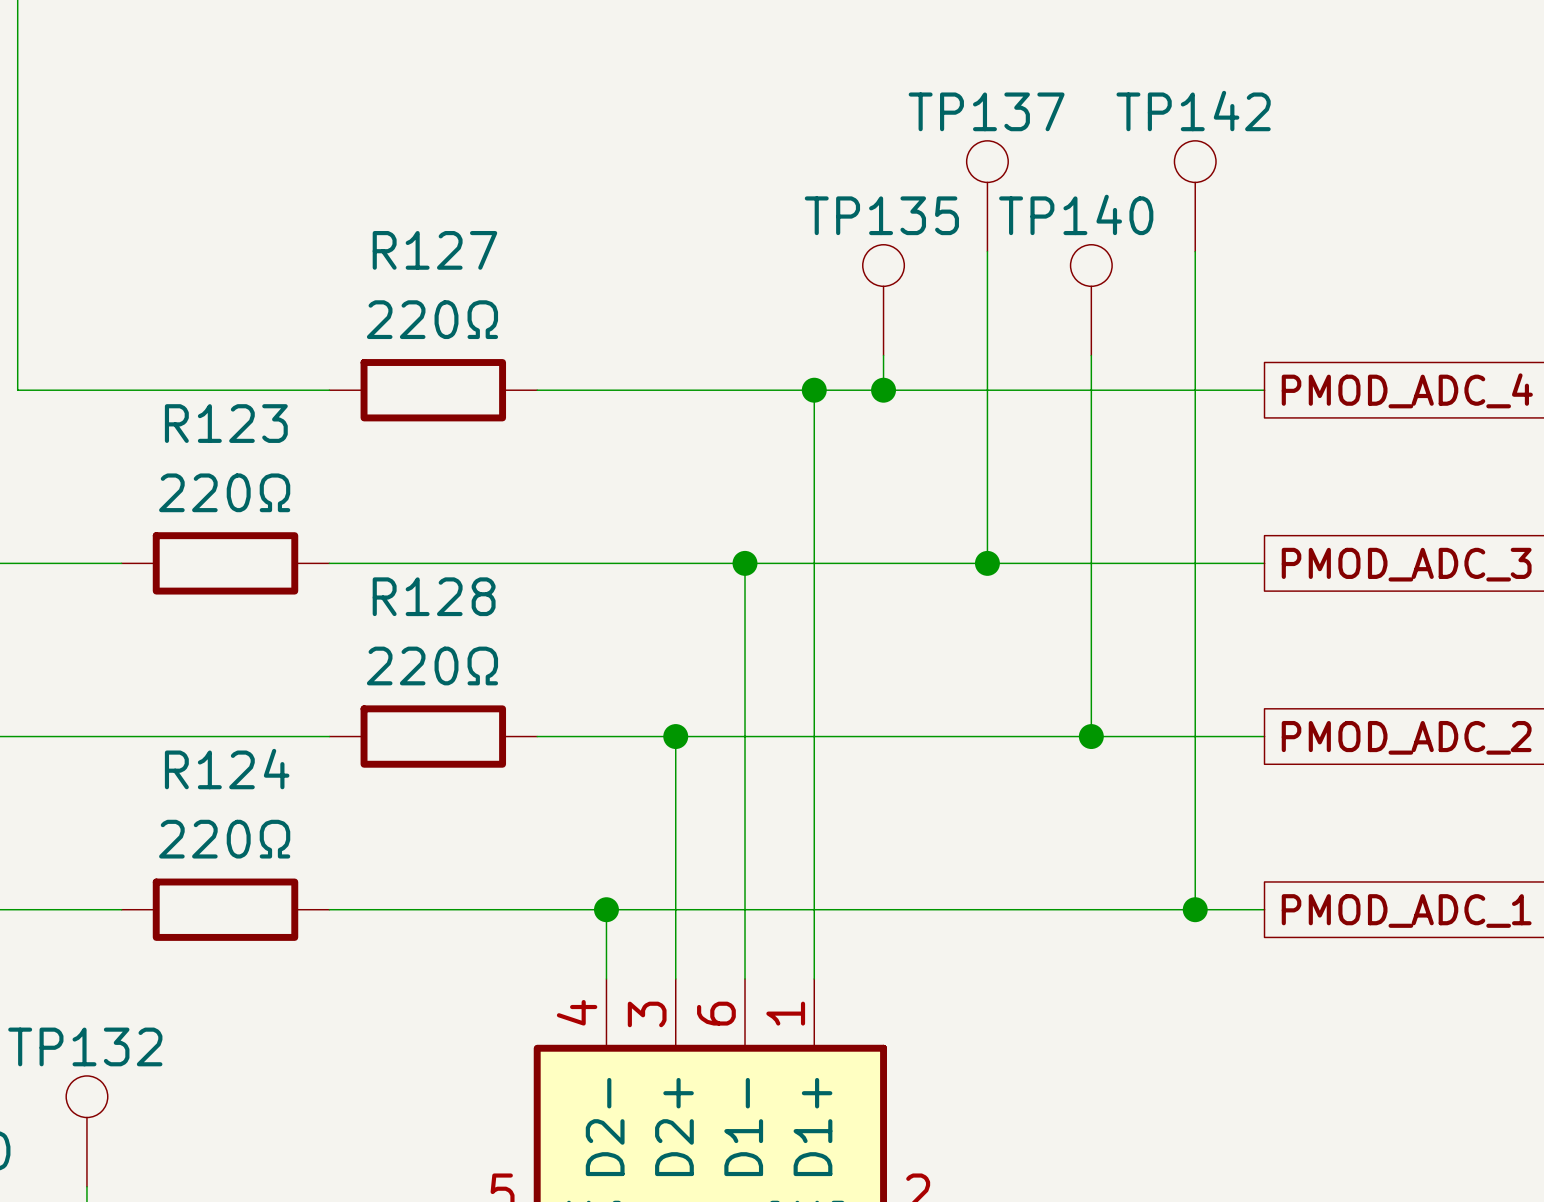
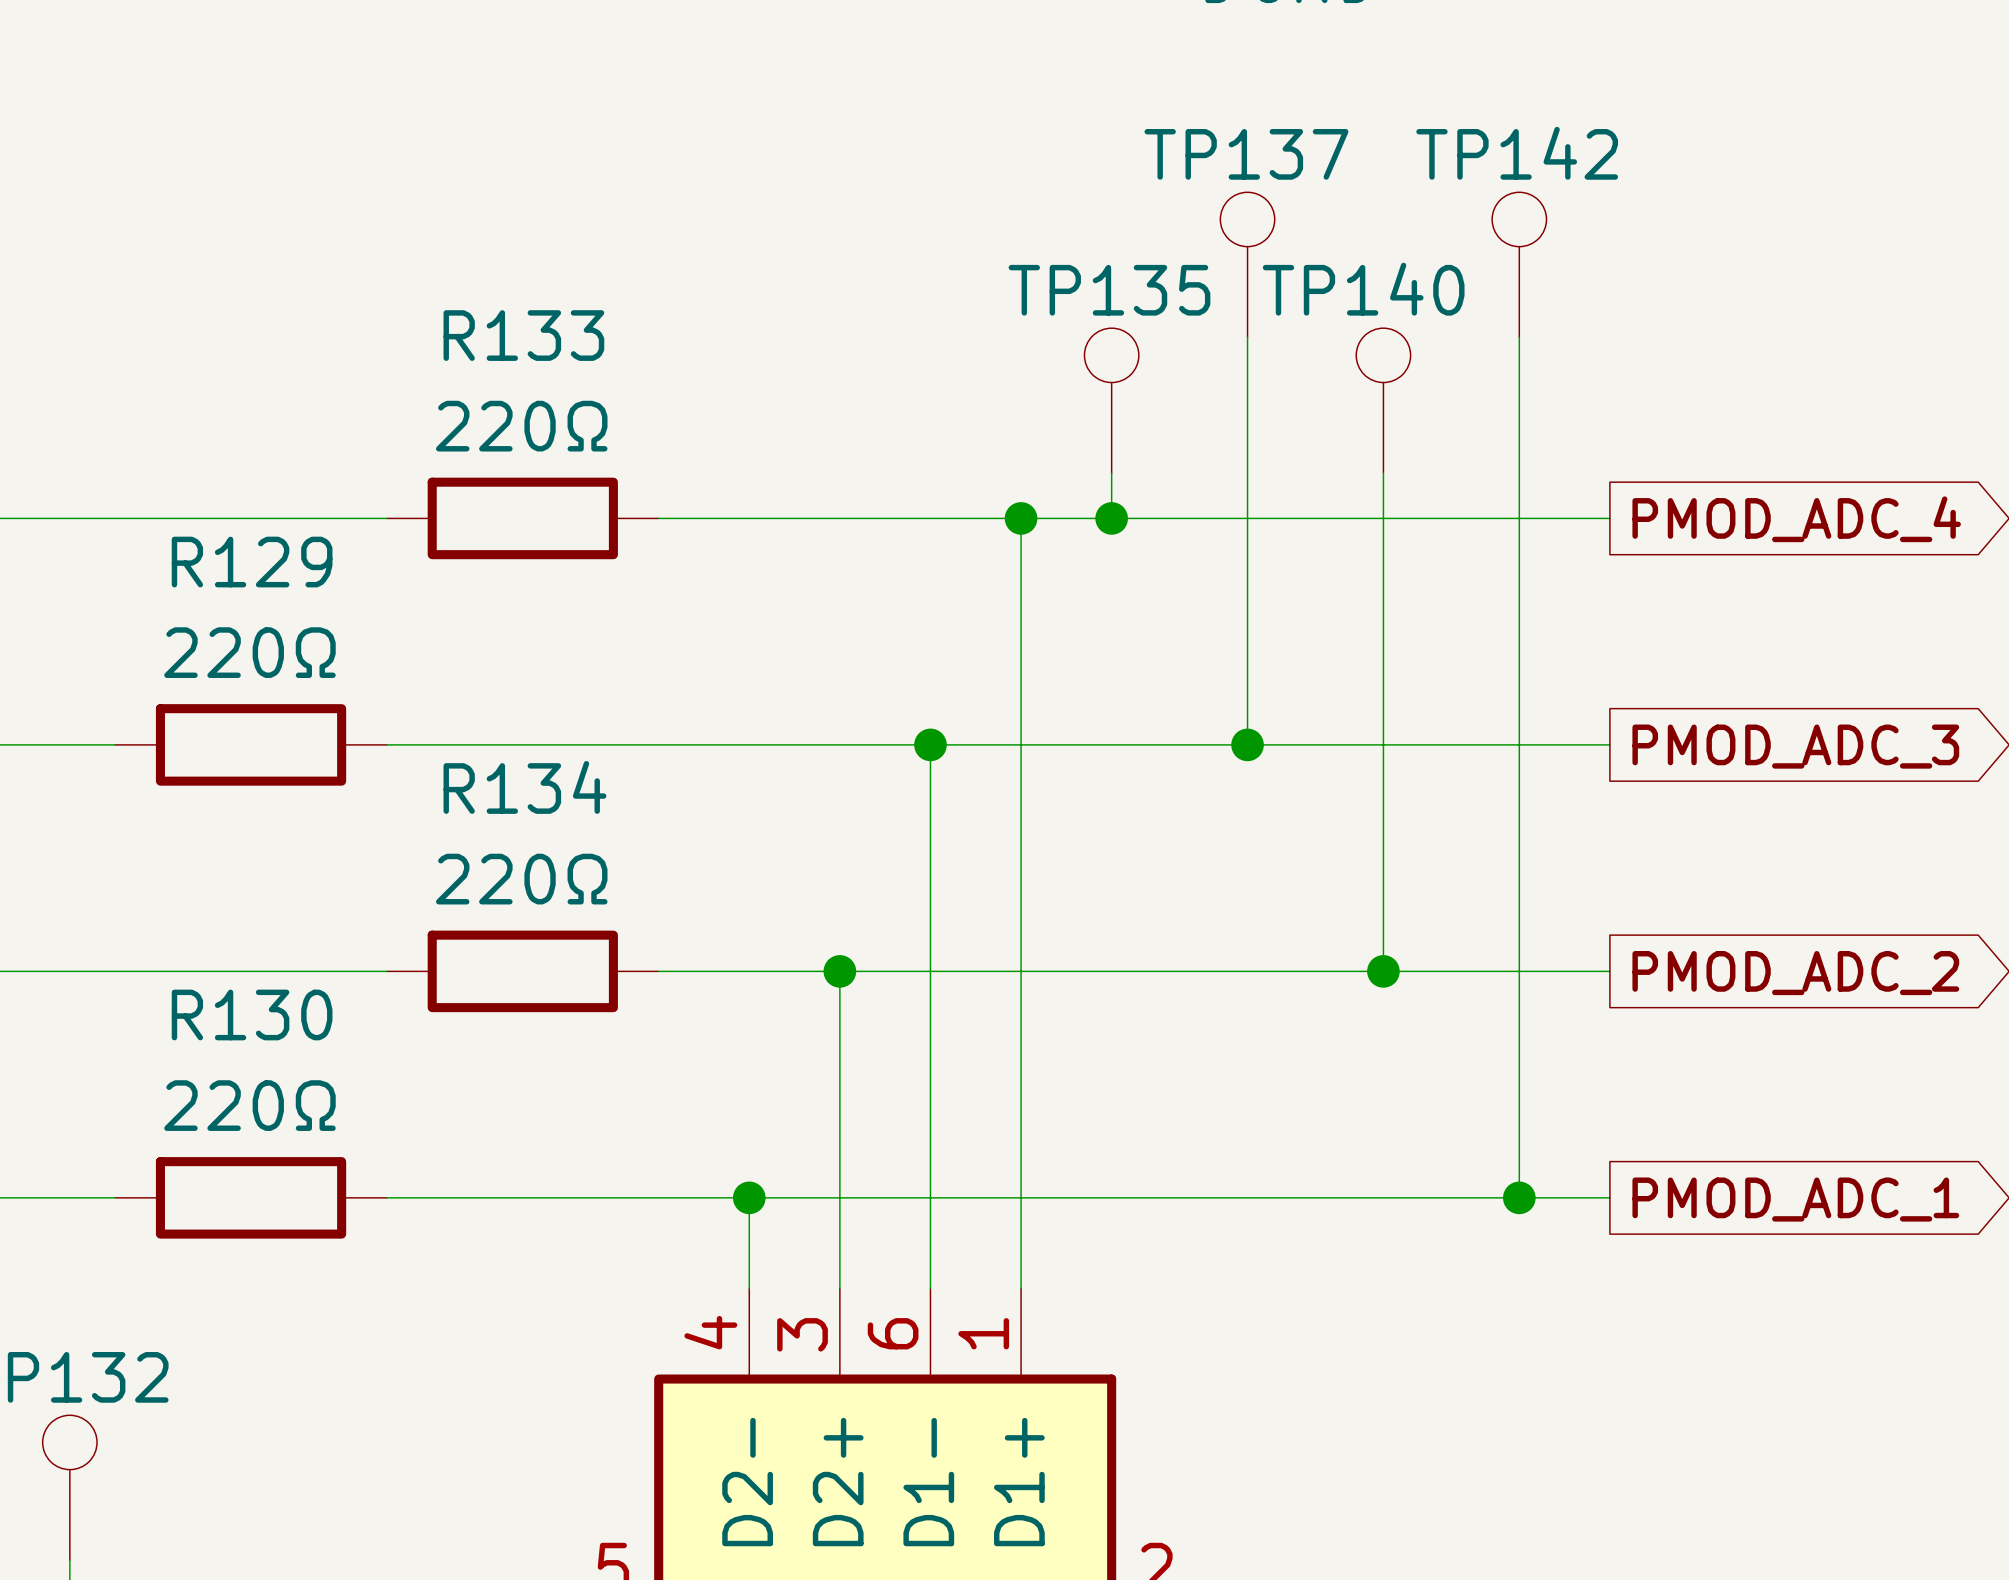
R127 name: R127 (434, 250) -> R133 (523, 335)
R123 name: R123 (226, 423) -> R129 (252, 562)
R128 name: R128 (434, 596) -> R134 (524, 787)
R124 name: R124 (227, 769) -> R130 (252, 1014)

